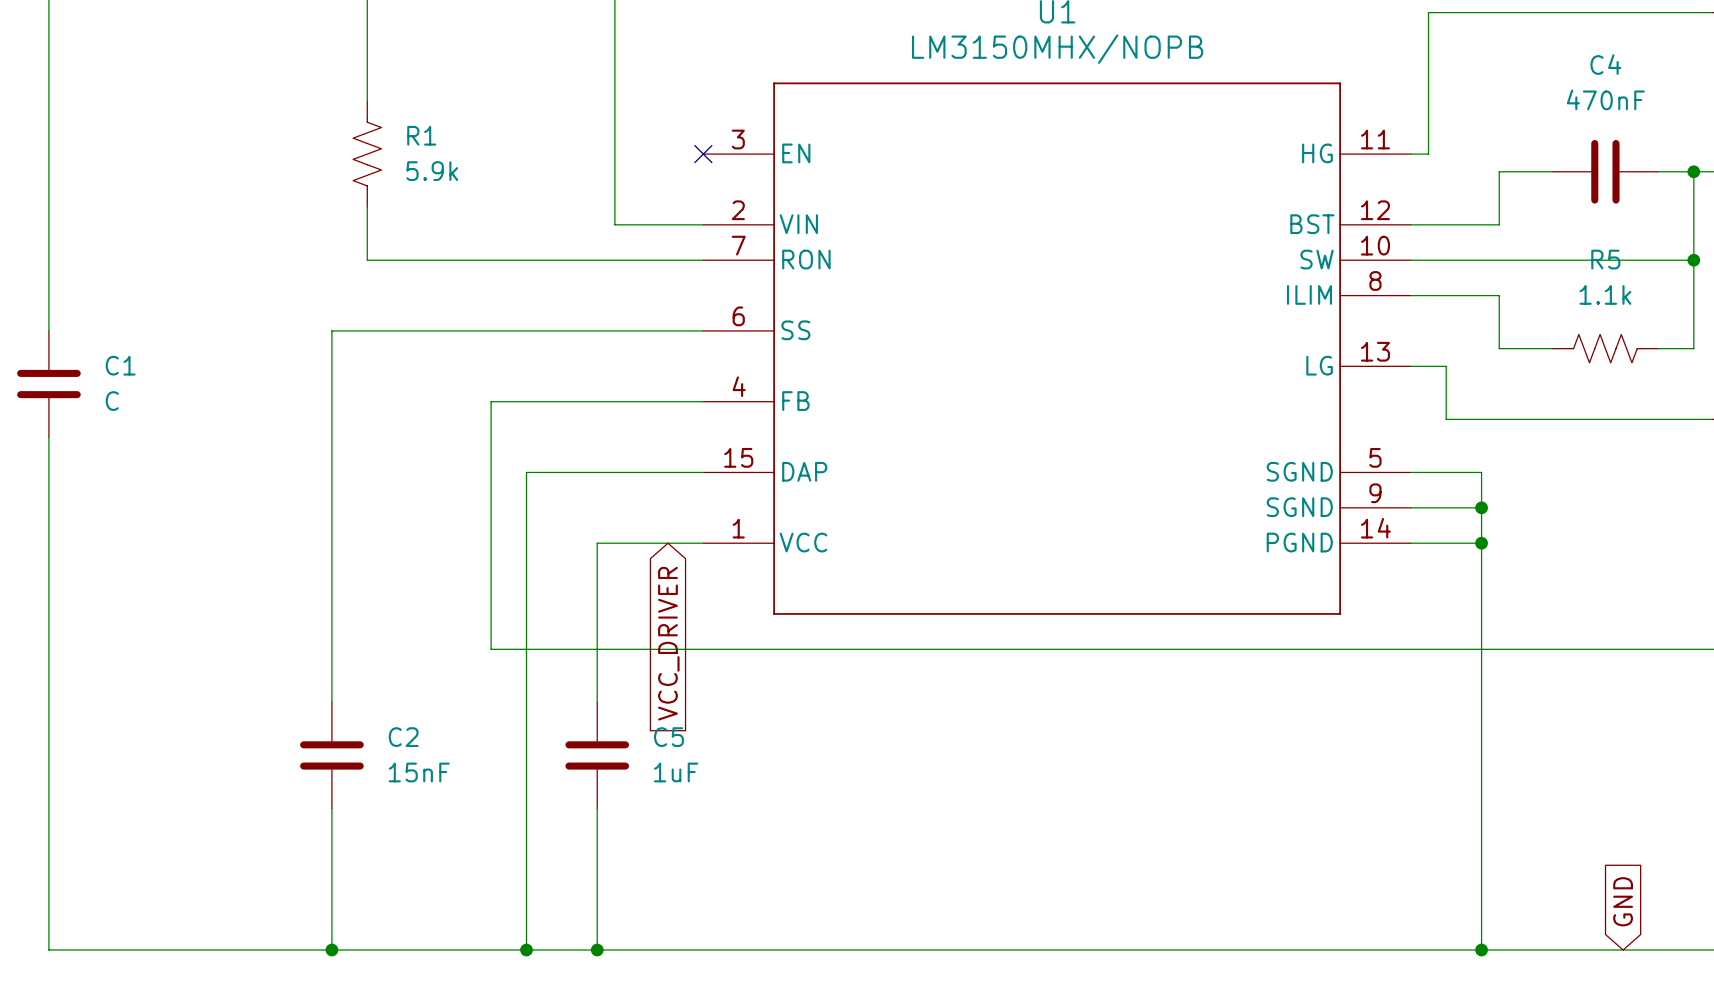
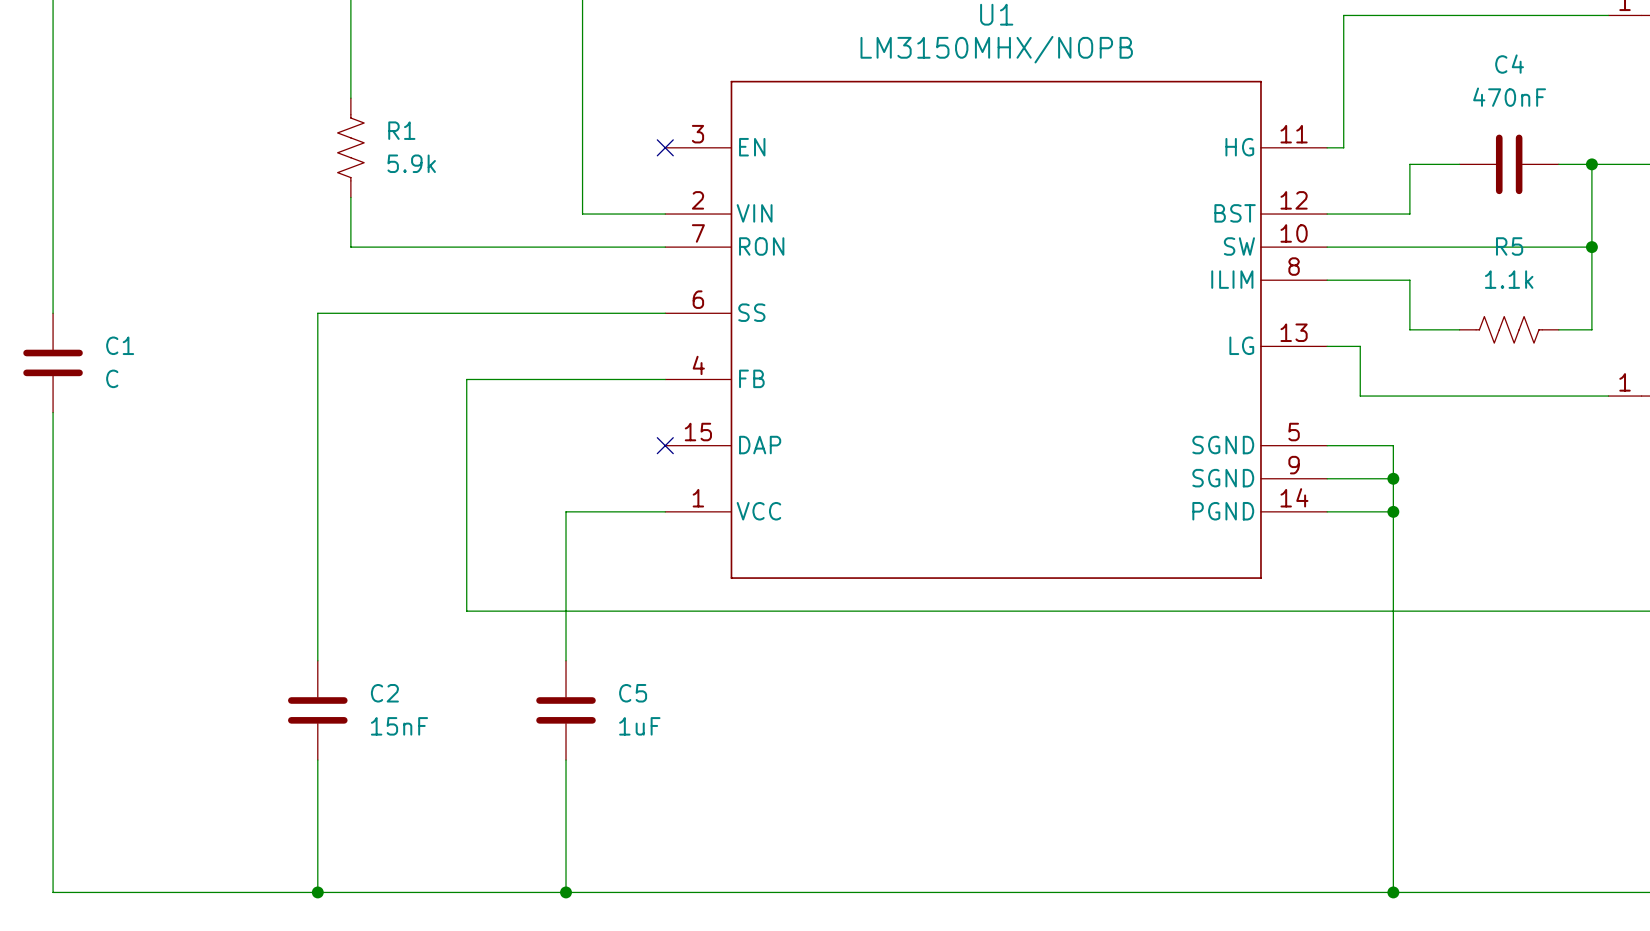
wire: (703, 472) (526, 472) (526, 950) -> none
no-connect mark: none -> (665, 445)
global label: VCC_DRIVER (668, 643) -> none
global label: GND (1623, 901) -> none
junction: (526, 950) -> none

